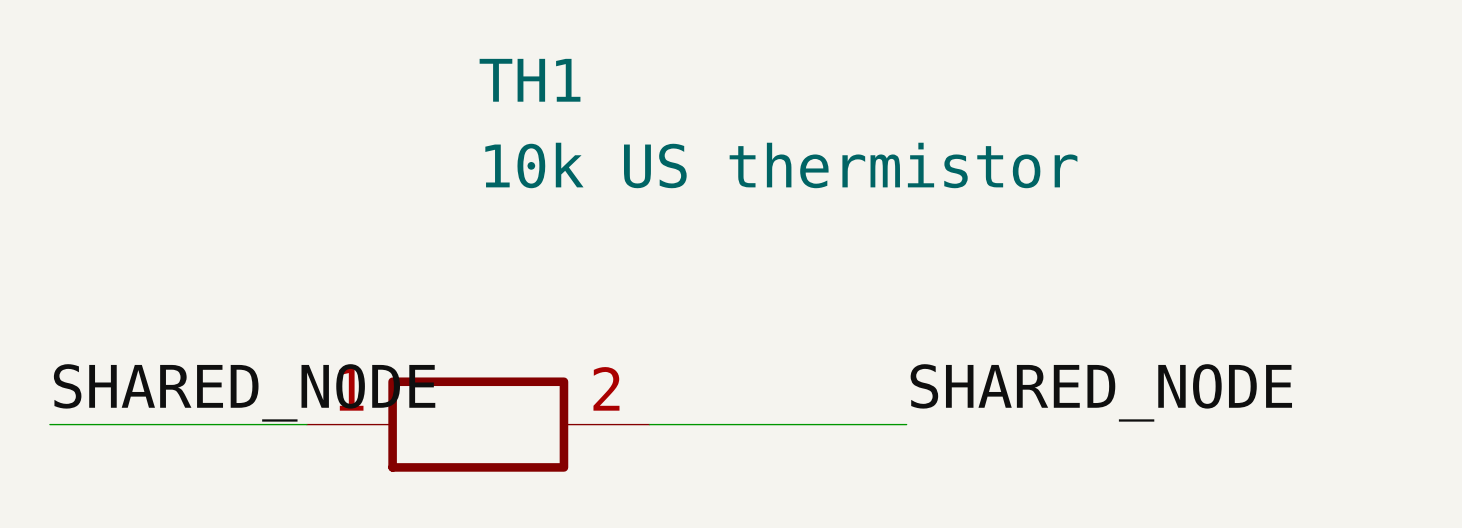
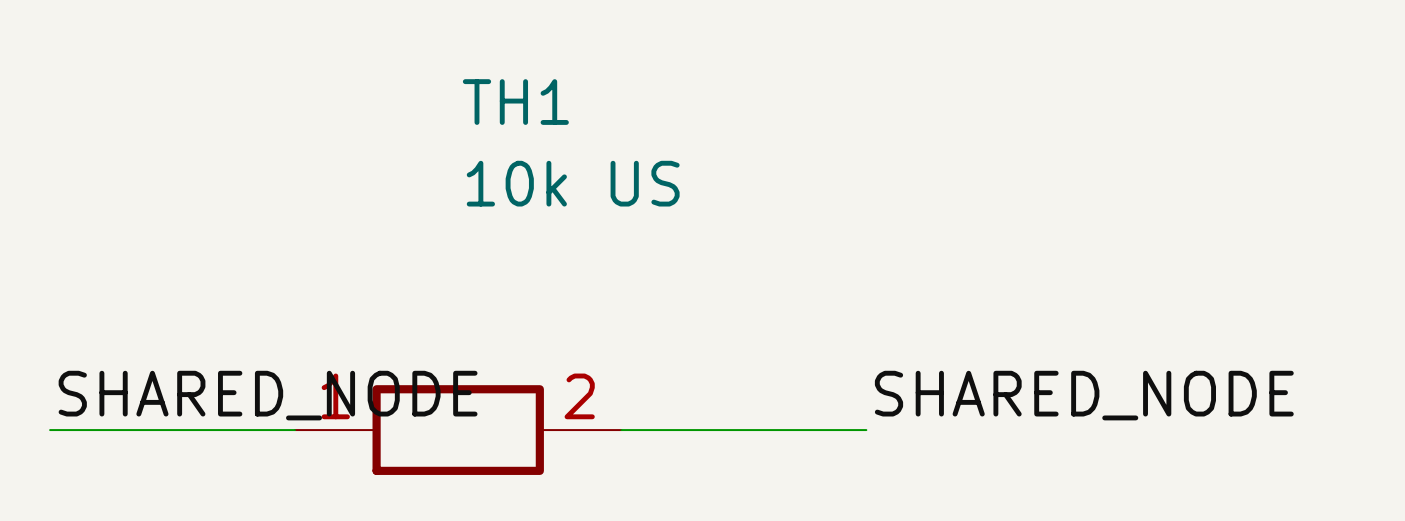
TH1 value: 10k US thermistor (781, 165) -> 10k US (573, 183)

